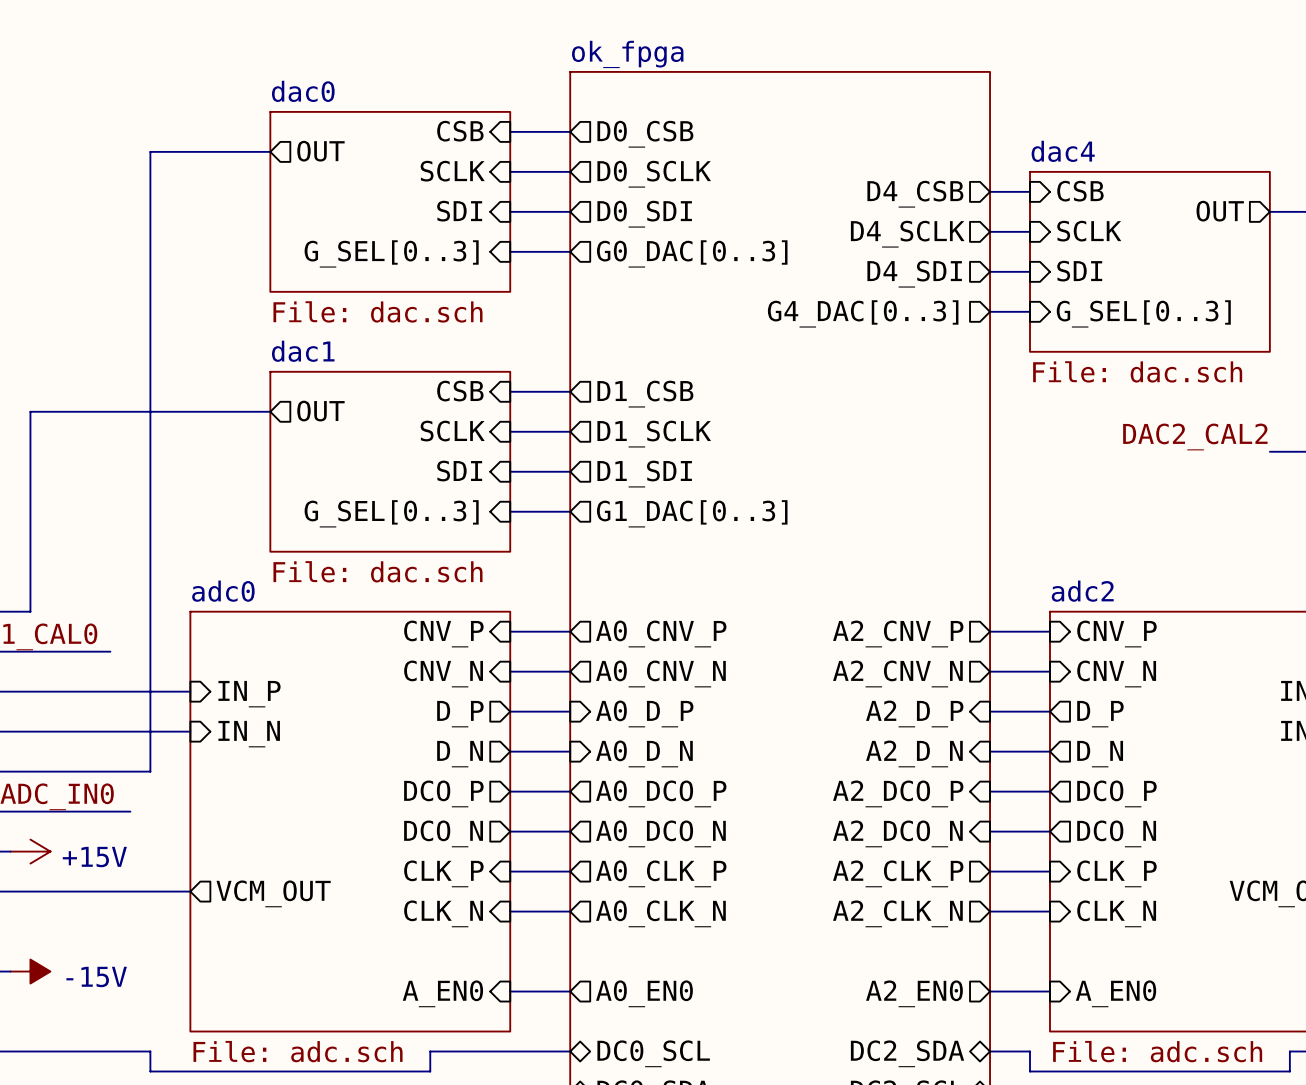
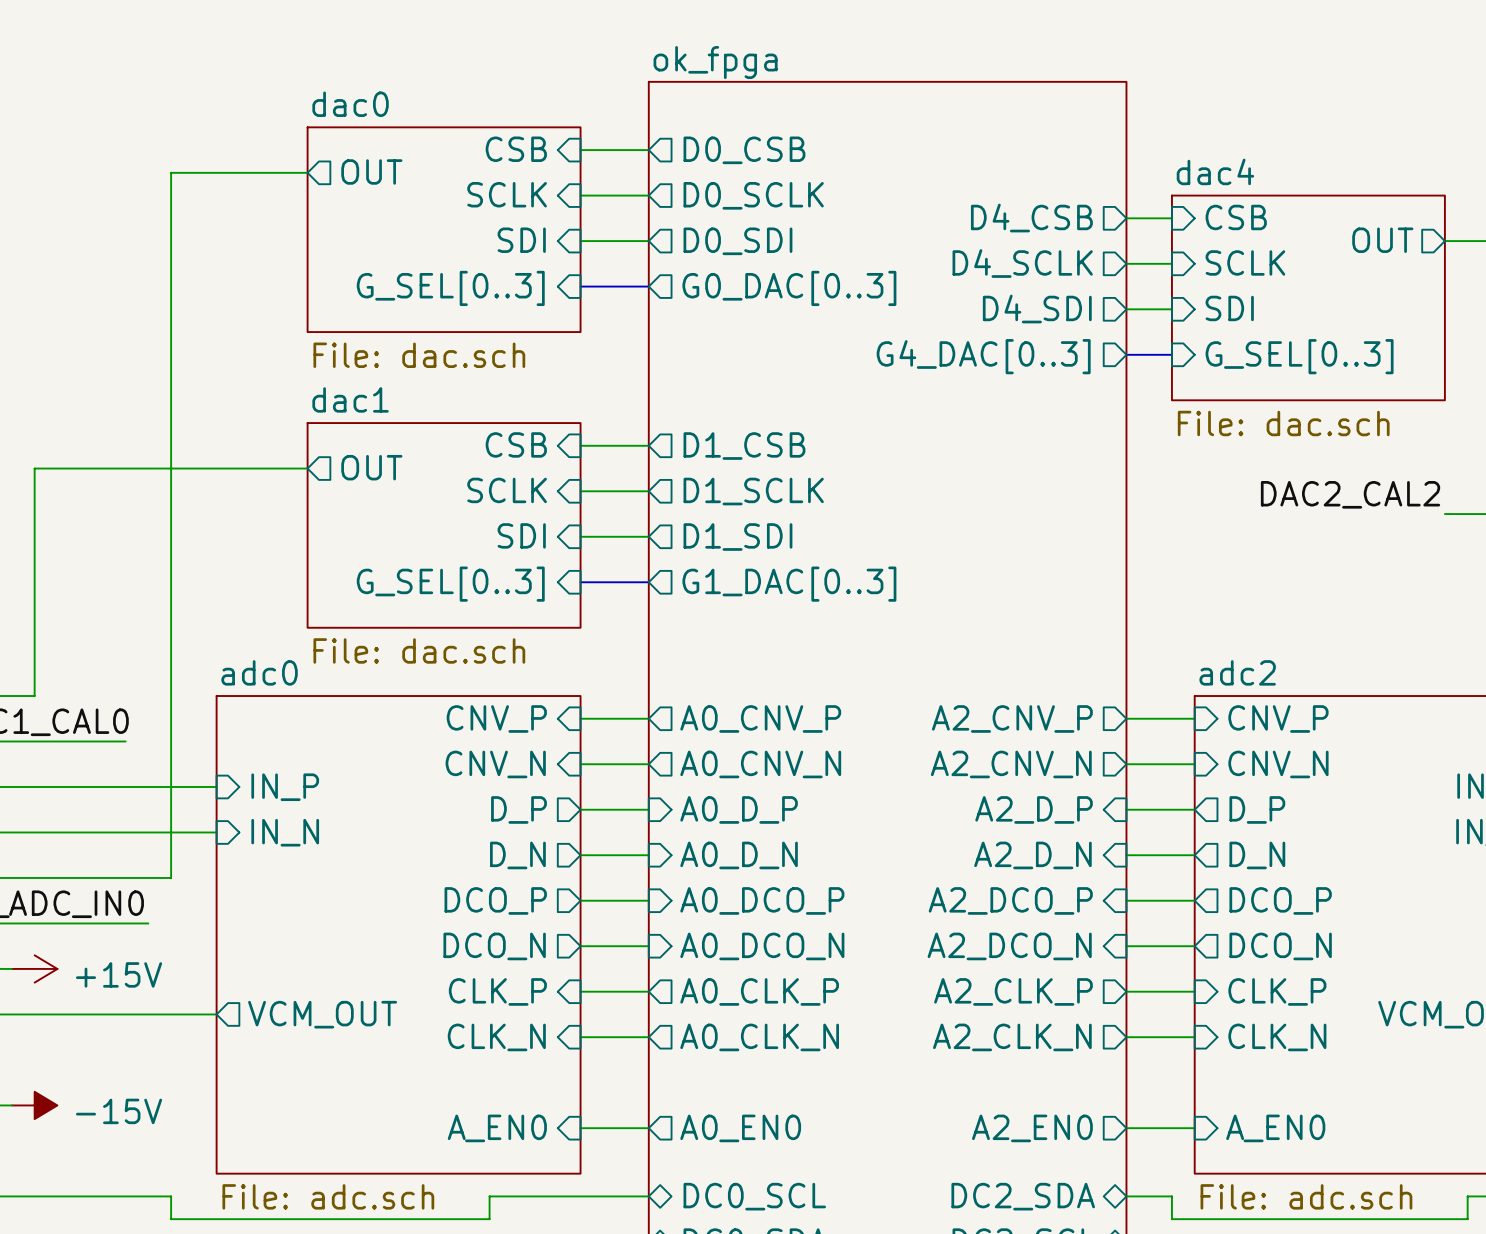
sheet pin shape: output (661, 793) -> input (762, 900)
sheet pin shape: output (660, 833) -> input (762, 946)

